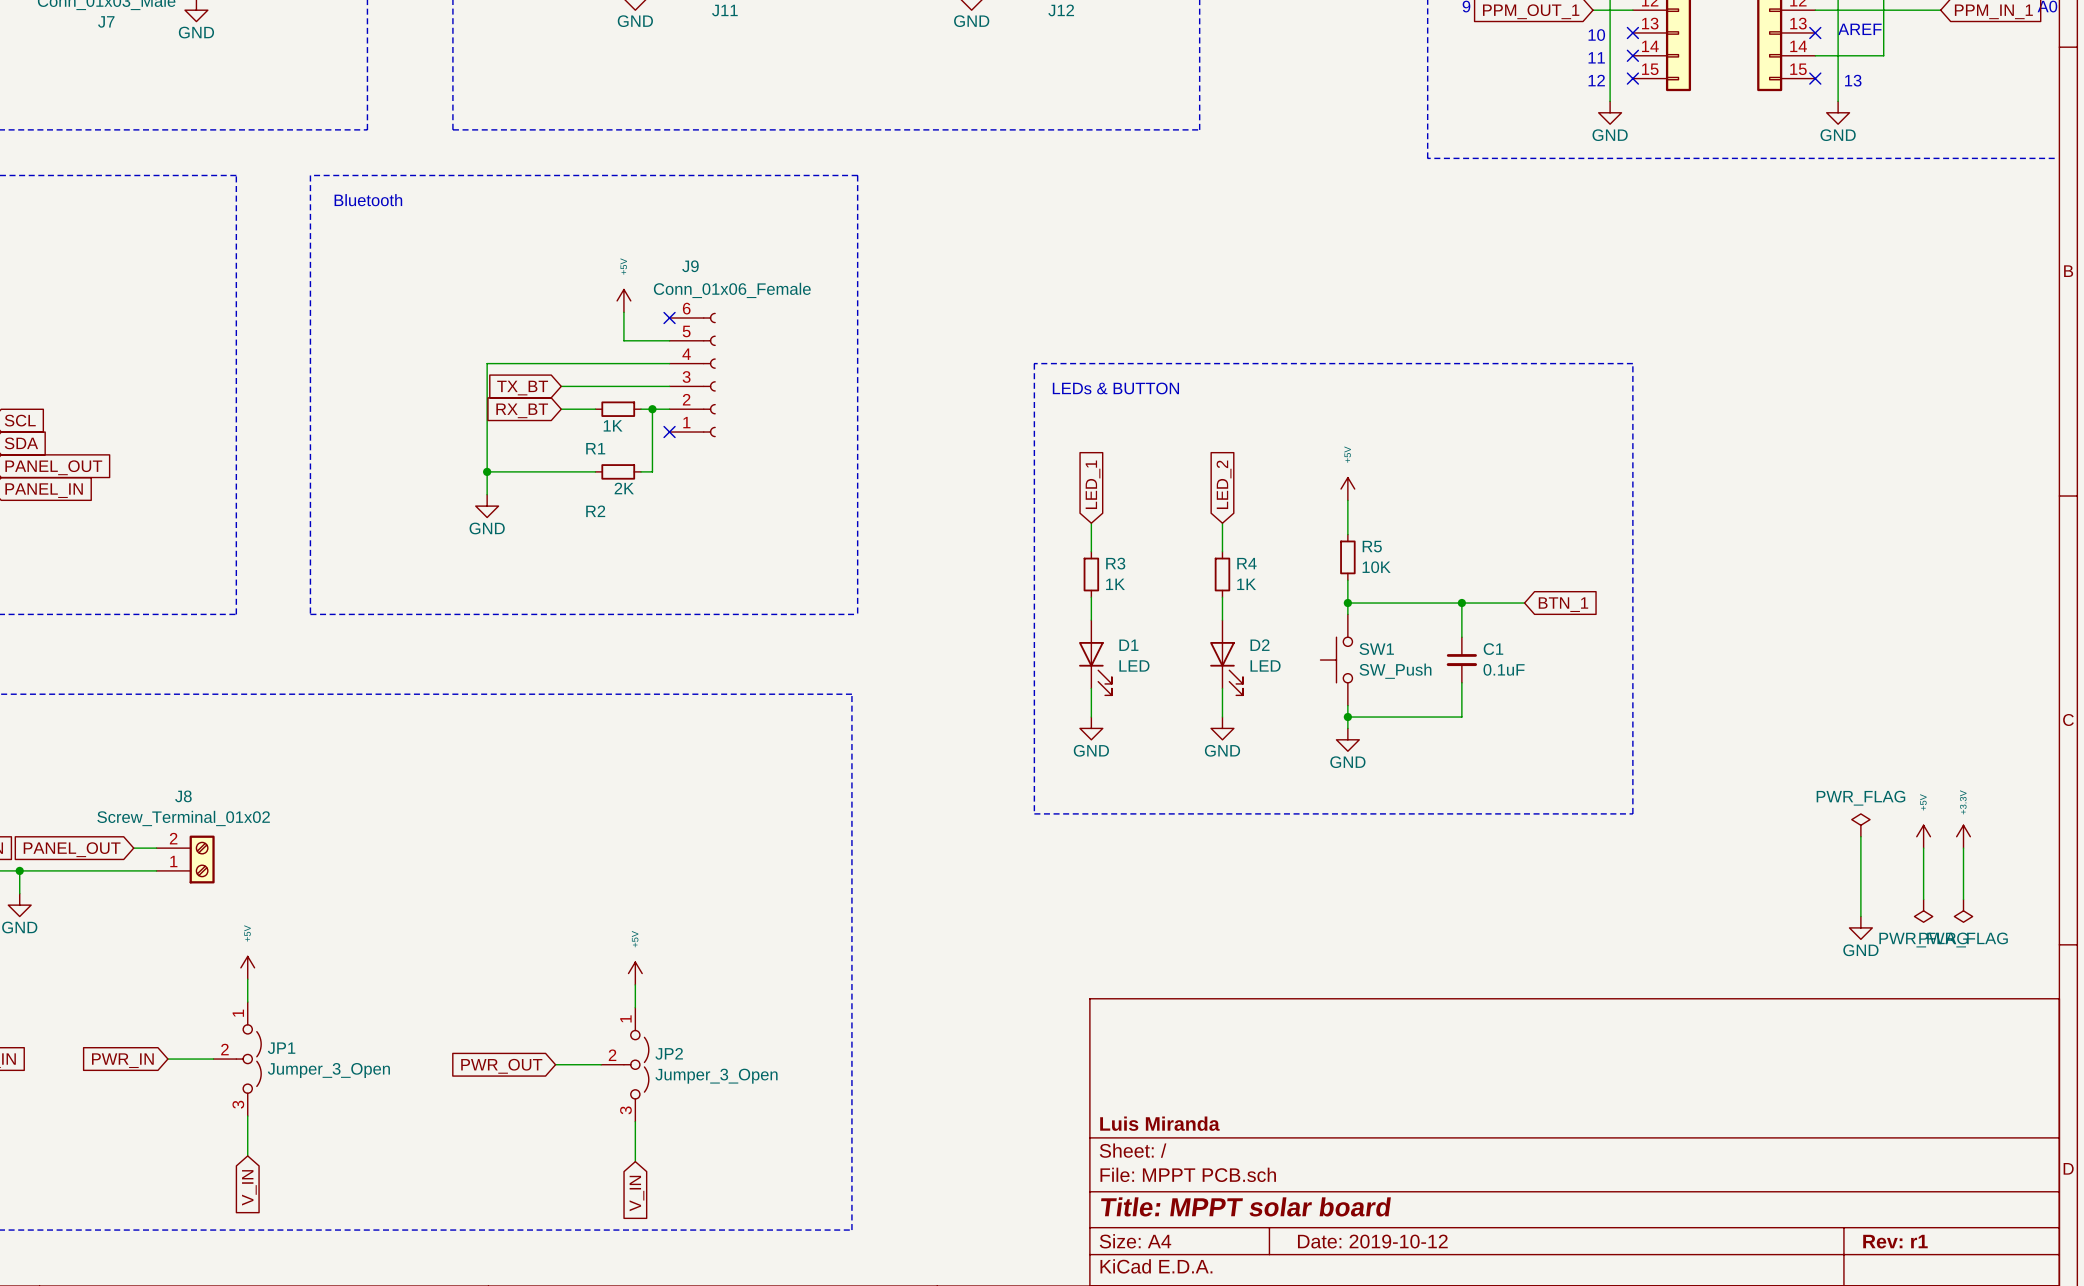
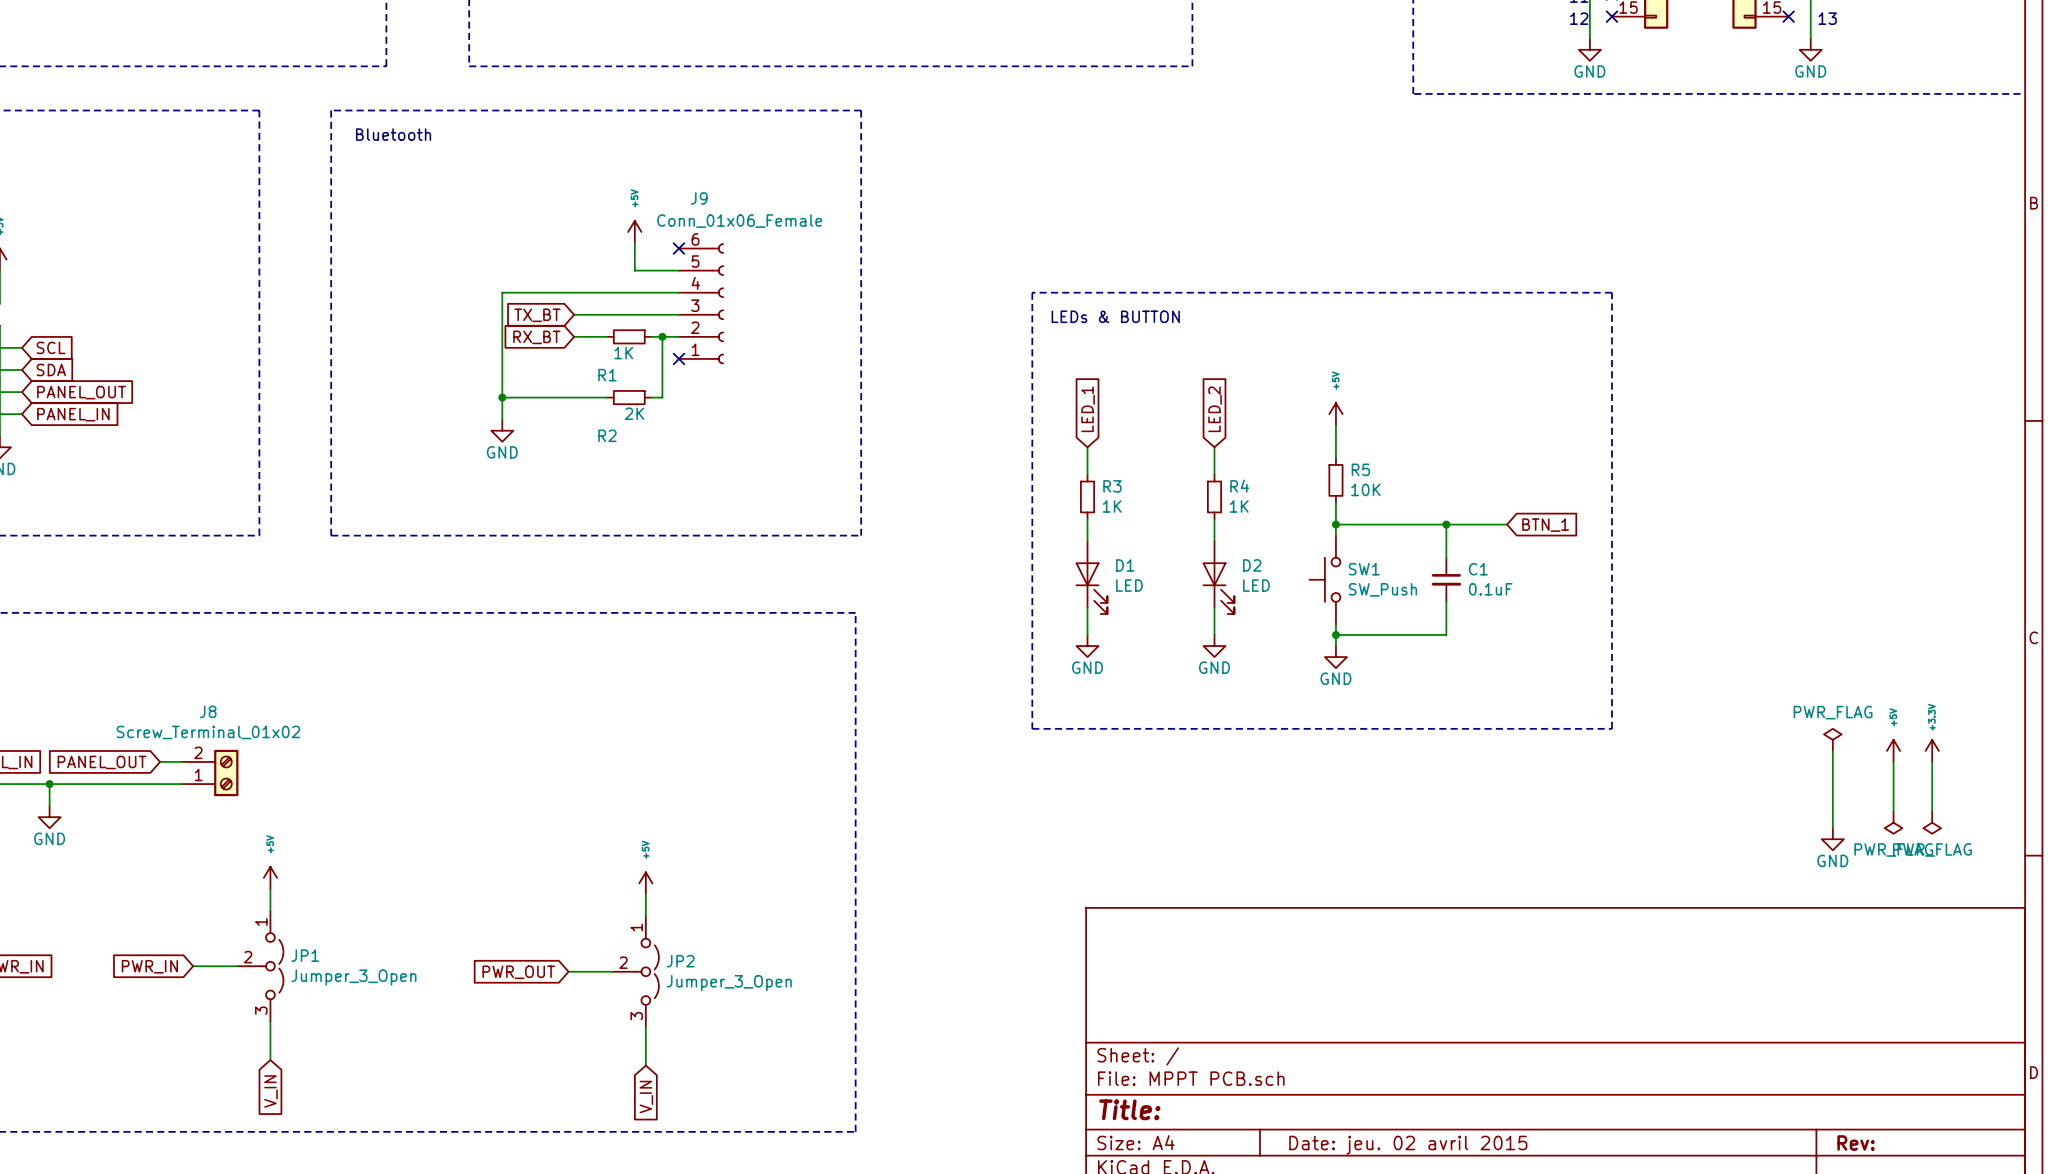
title block: Luis Miranda (1159, 1123) -> none
title block: Title: MPPT solar board (1245, 1206) -> Title: (1129, 1109)
title block: Date: 2019-10-12 (1372, 1241) -> Date: jeu. 02 avril 2015 (1408, 1145)
title block: Rev: r1 (1895, 1241) -> Rev: (1856, 1142)

